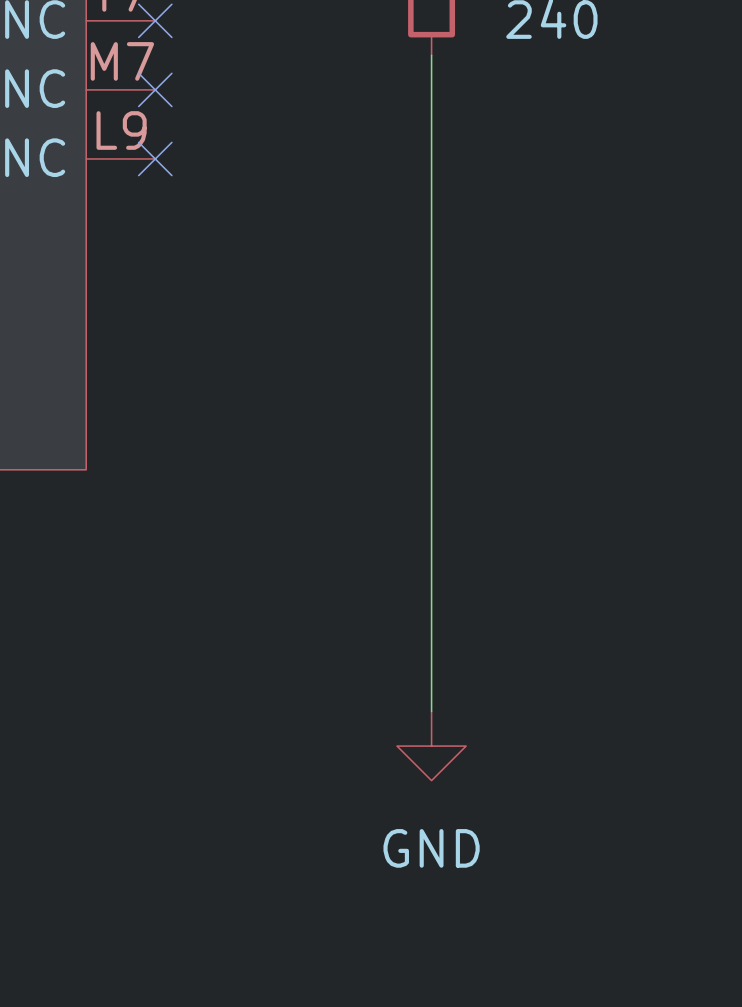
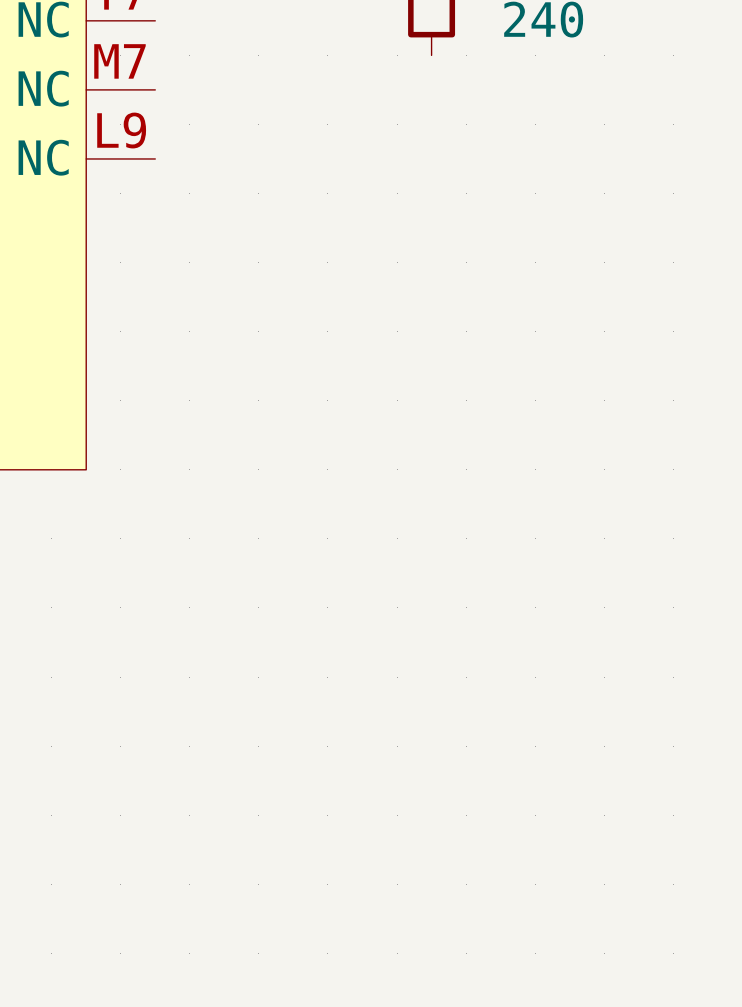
no-connect mark: (155, 20) -> none
wire: (431, 55) (431, 711) -> none
no-connect mark: (155, 89) -> none
no-connect mark: (155, 158) -> none
power symbol: GND (431, 746) -> none

